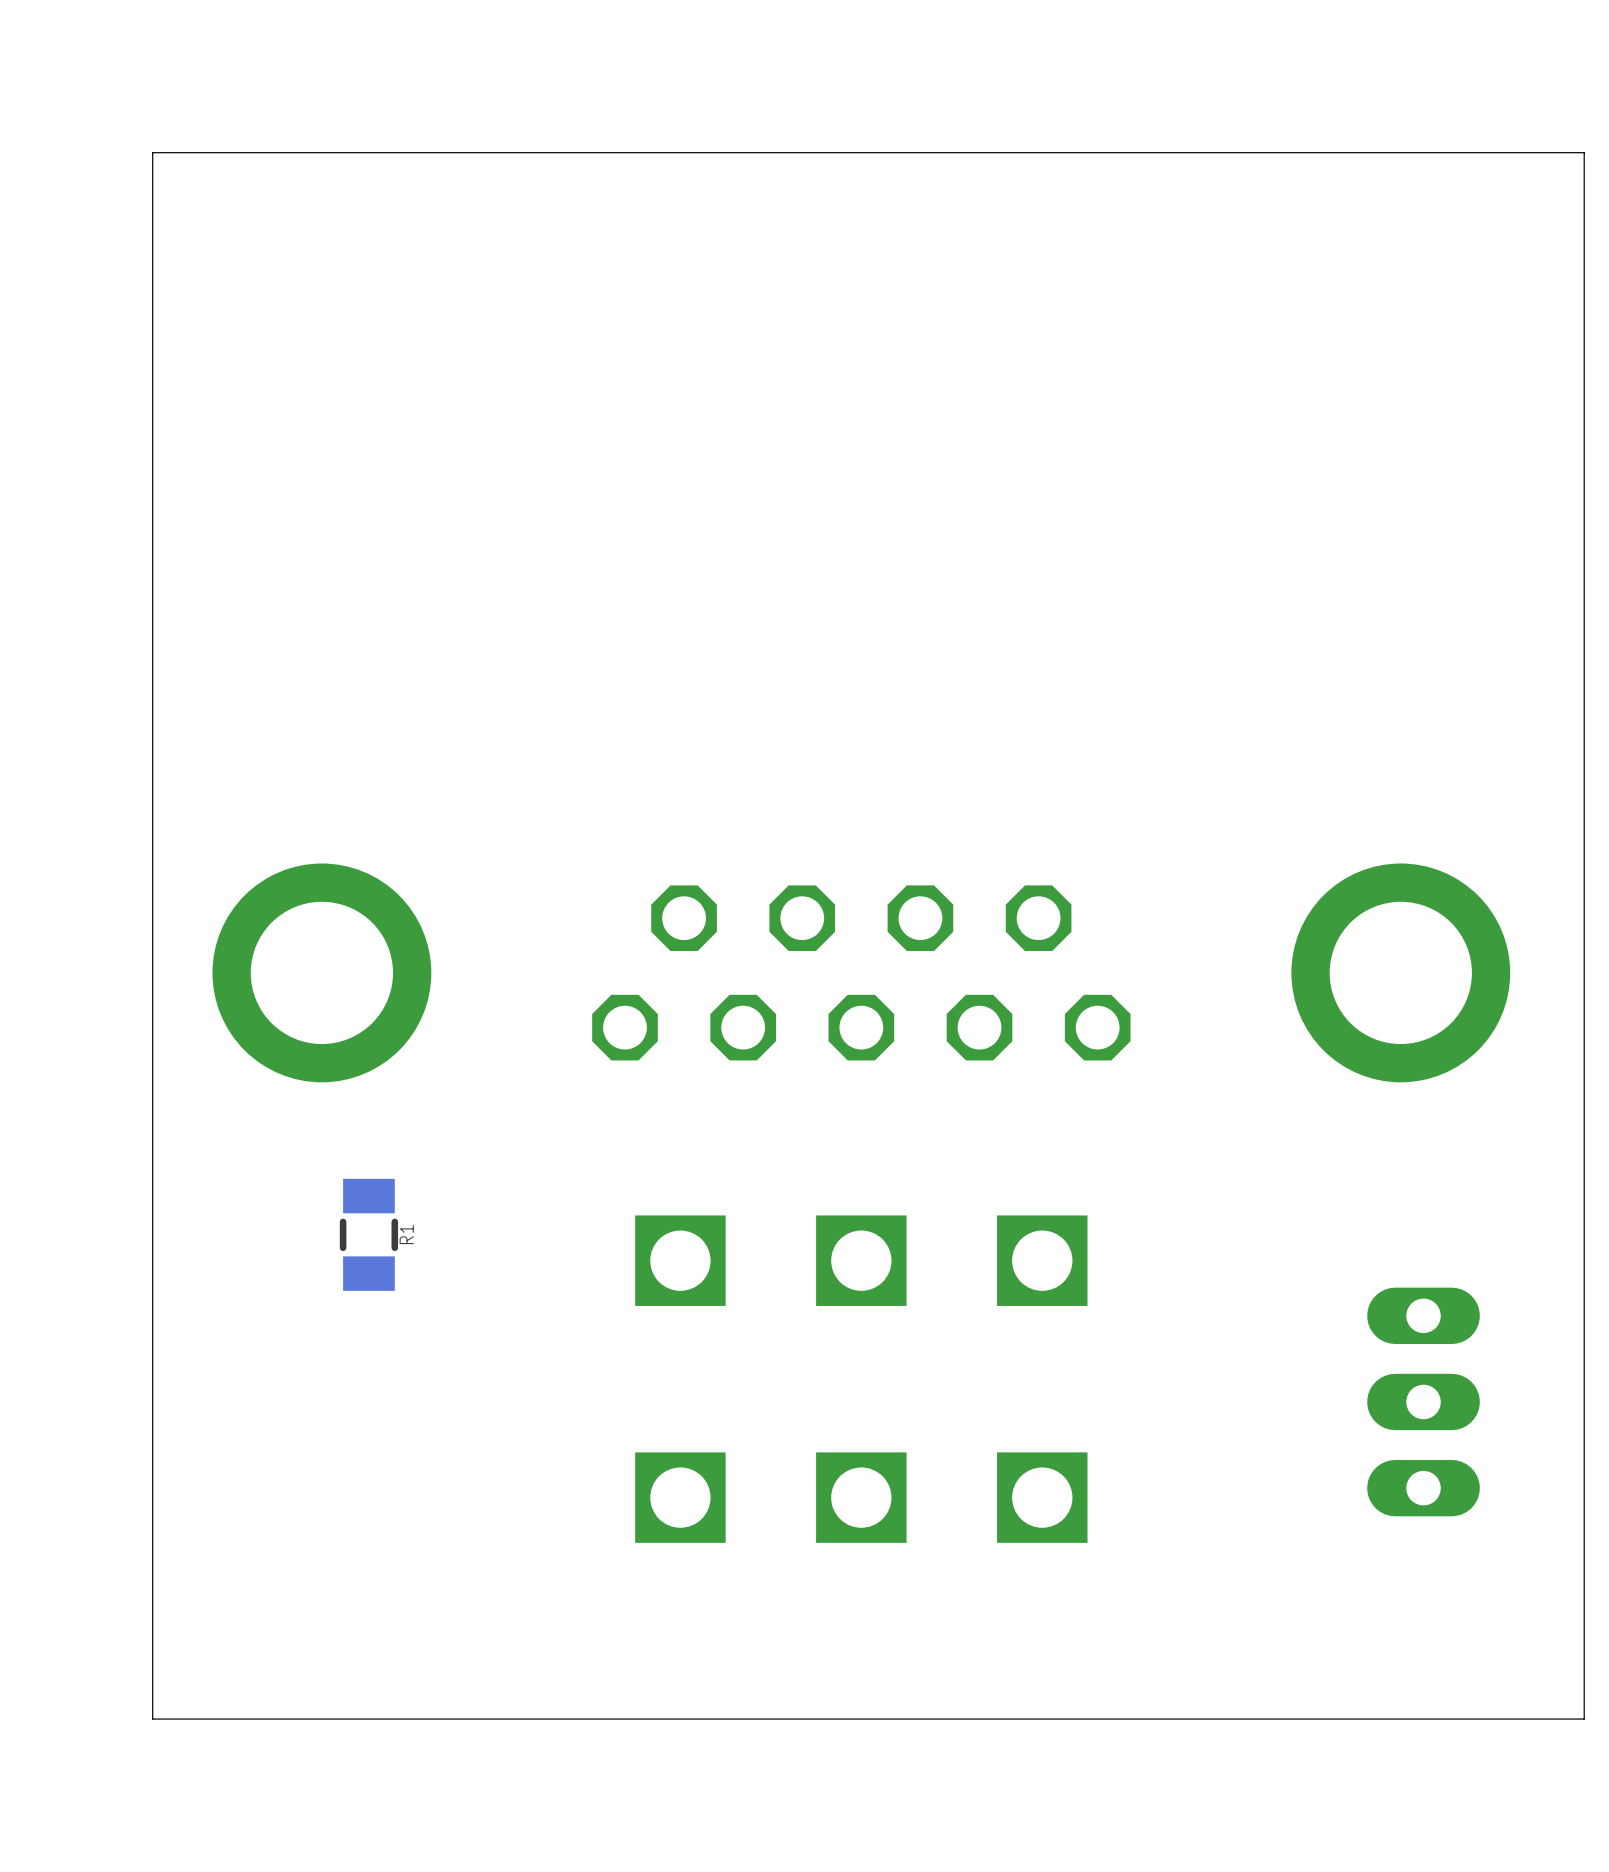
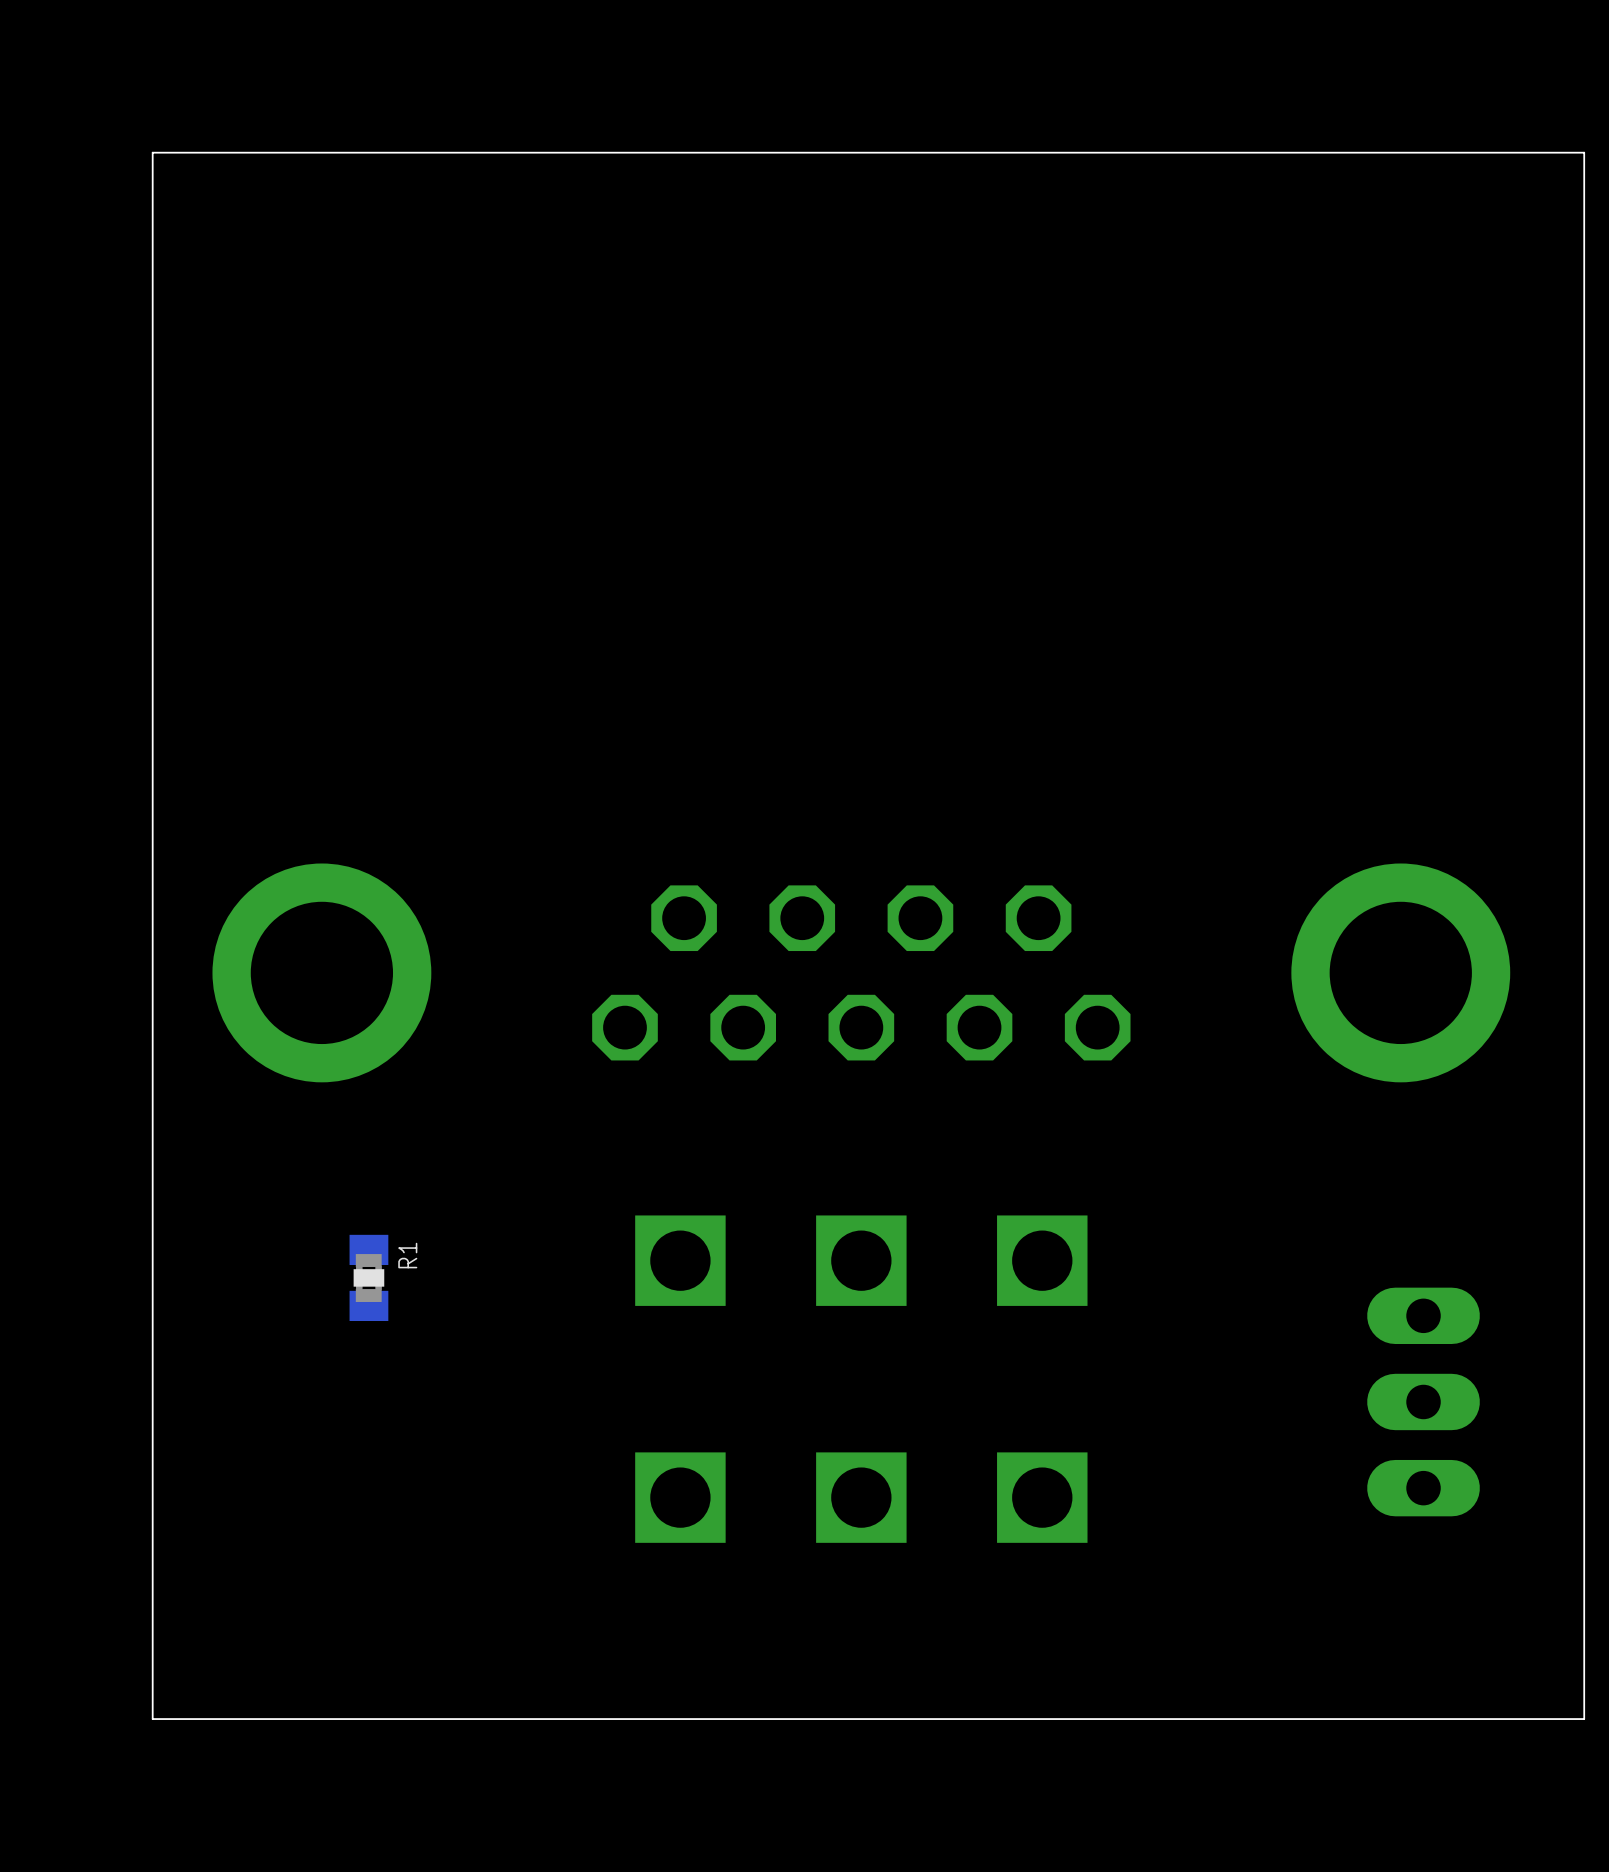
R1 footprint: [339, 1178, 399, 1291] -> [349, 1234, 389, 1321]

